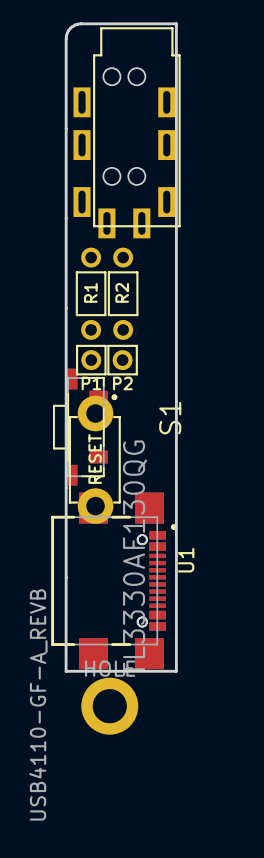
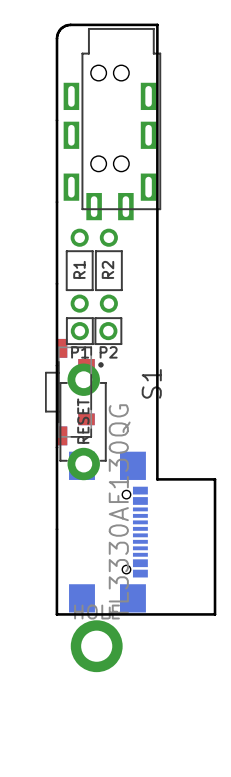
board edge: (176, 522) (176, 671) -> (157, 479) (215, 479) (215, 614) (157, 614)
U1: USB4110-GF-A_REVB (113, 580) -> none

